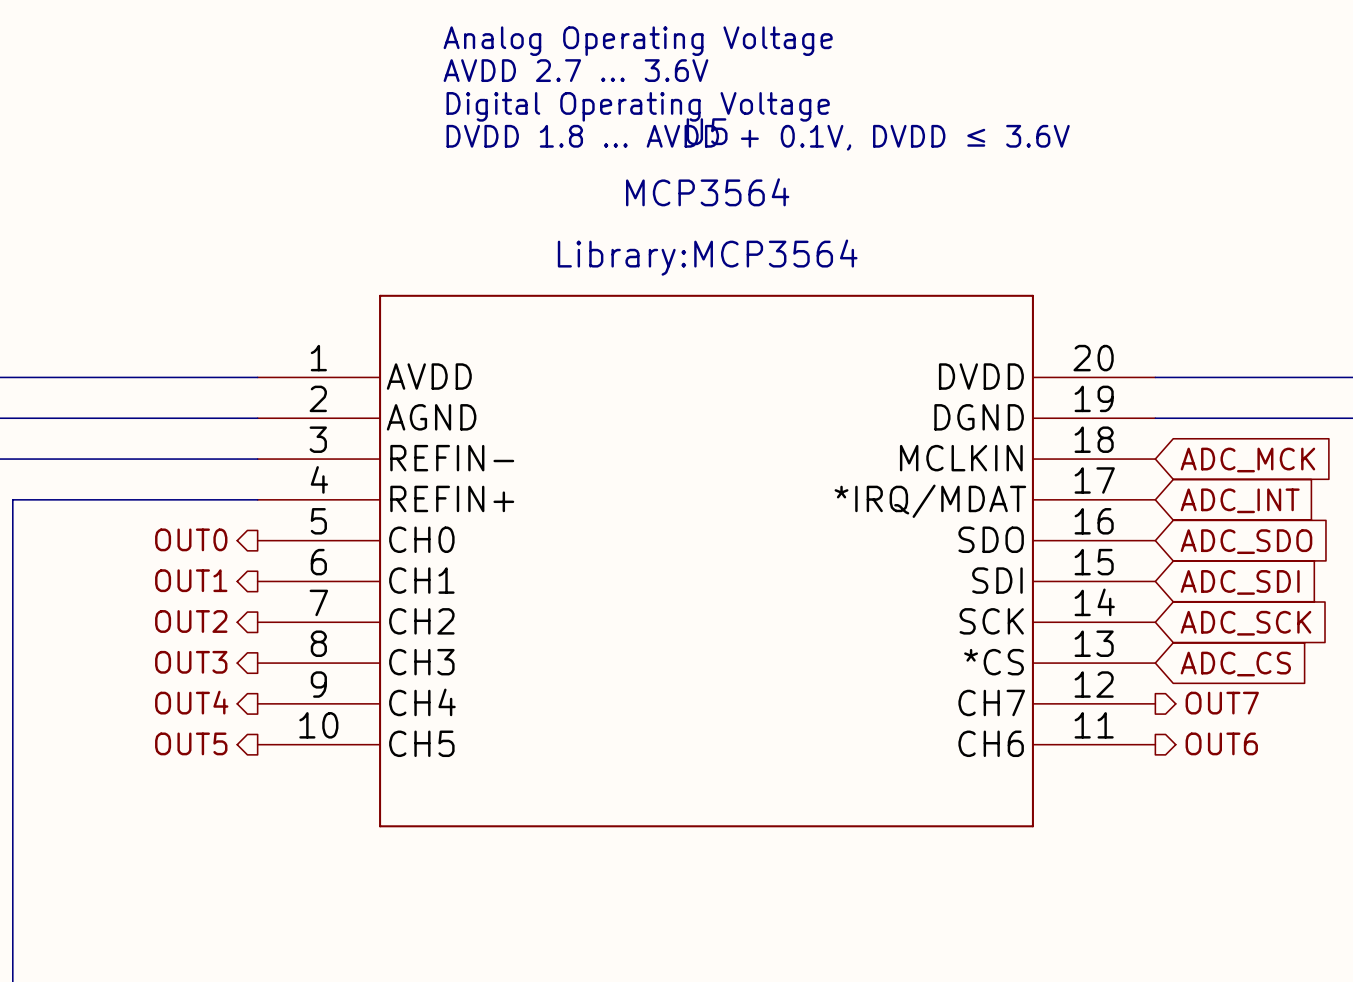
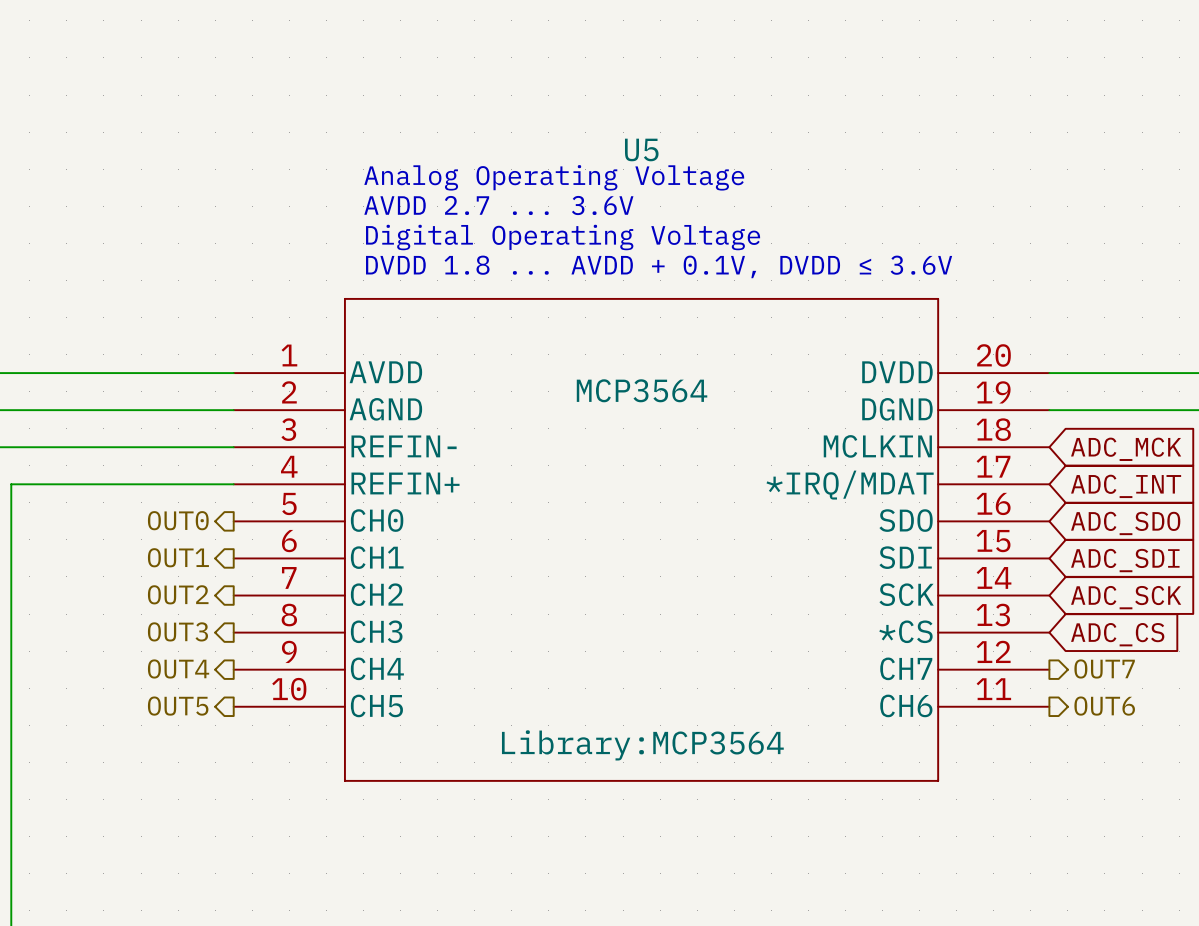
text position: Analog Operating Voltage (638, 41) -> Analog Operating Voltage (554, 177)
text position: AVDD 2.7 ... 3.6V (575, 70) -> AVDD 2.7 ... 3.6V (498, 205)
text position: Digital Operating Voltage (638, 106) -> Digital Operating Voltage (563, 237)
text position: DVDD 1.8 ... AVDD + 0.1V, DVDD ≤ 3.6V (758, 137) -> DVDD 1.8 ... AVDD + 0.1V, DVDD ≤ 3.6V (659, 266)
U5 value position: MCP3564 (707, 192) -> MCP3564 (642, 390)
U5 text position: Library:MCP3564 (707, 257) -> Library:MCP3564 (642, 745)

